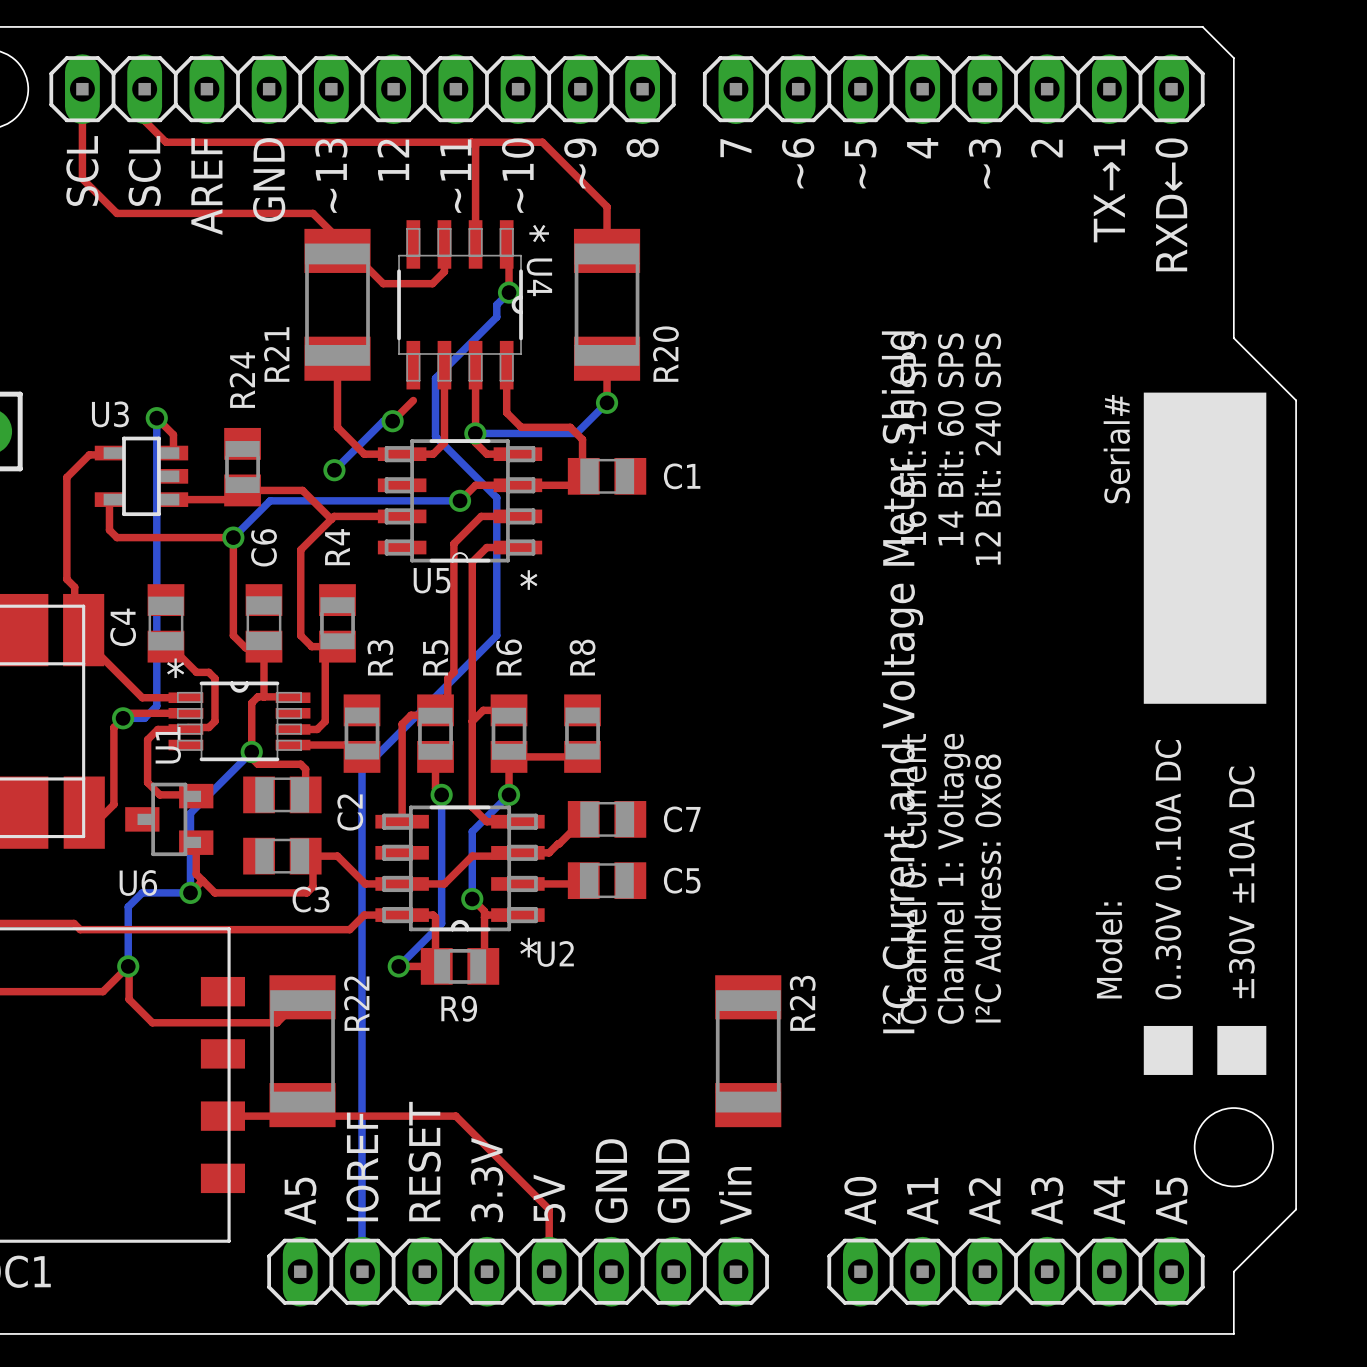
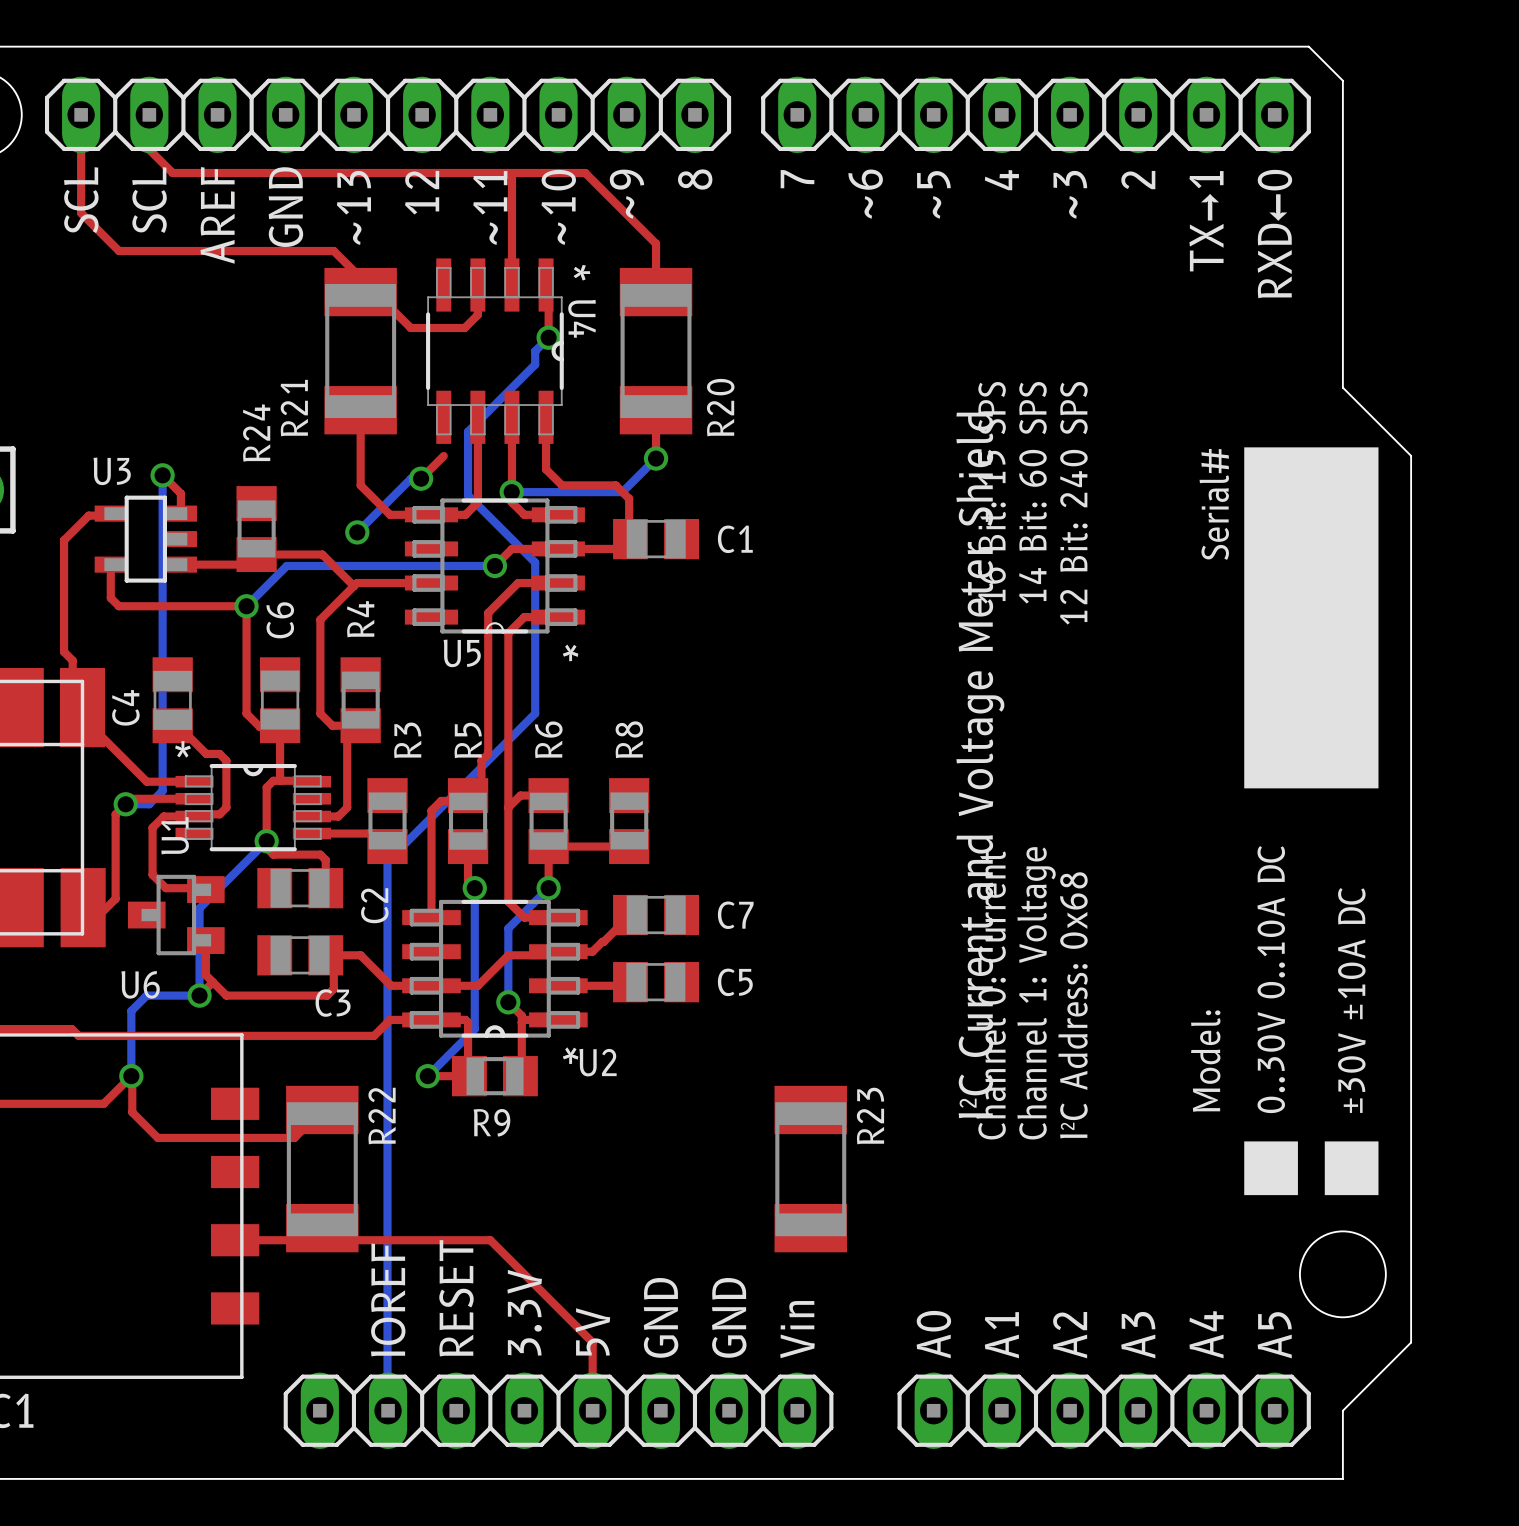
text: A5 (300, 1201) -> none

